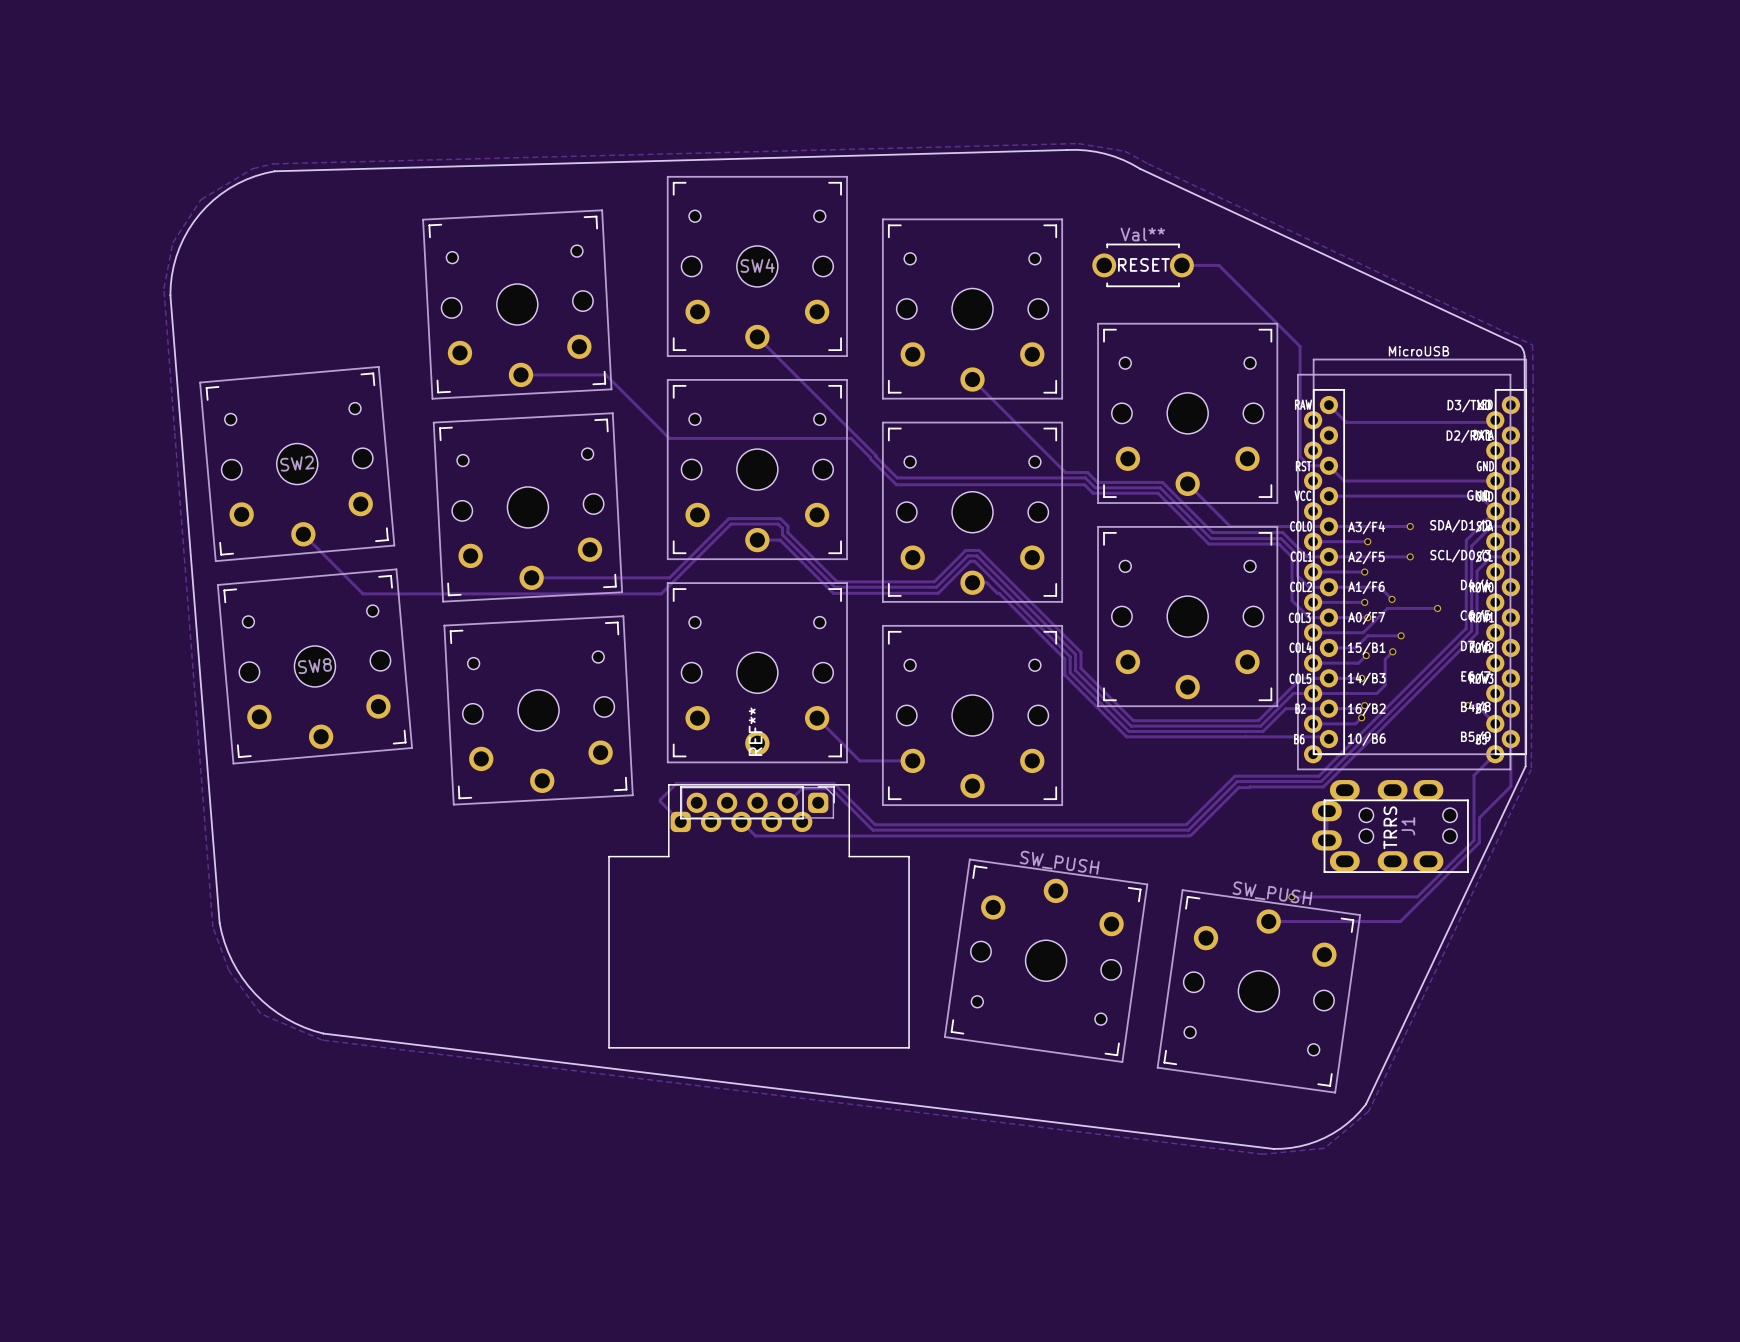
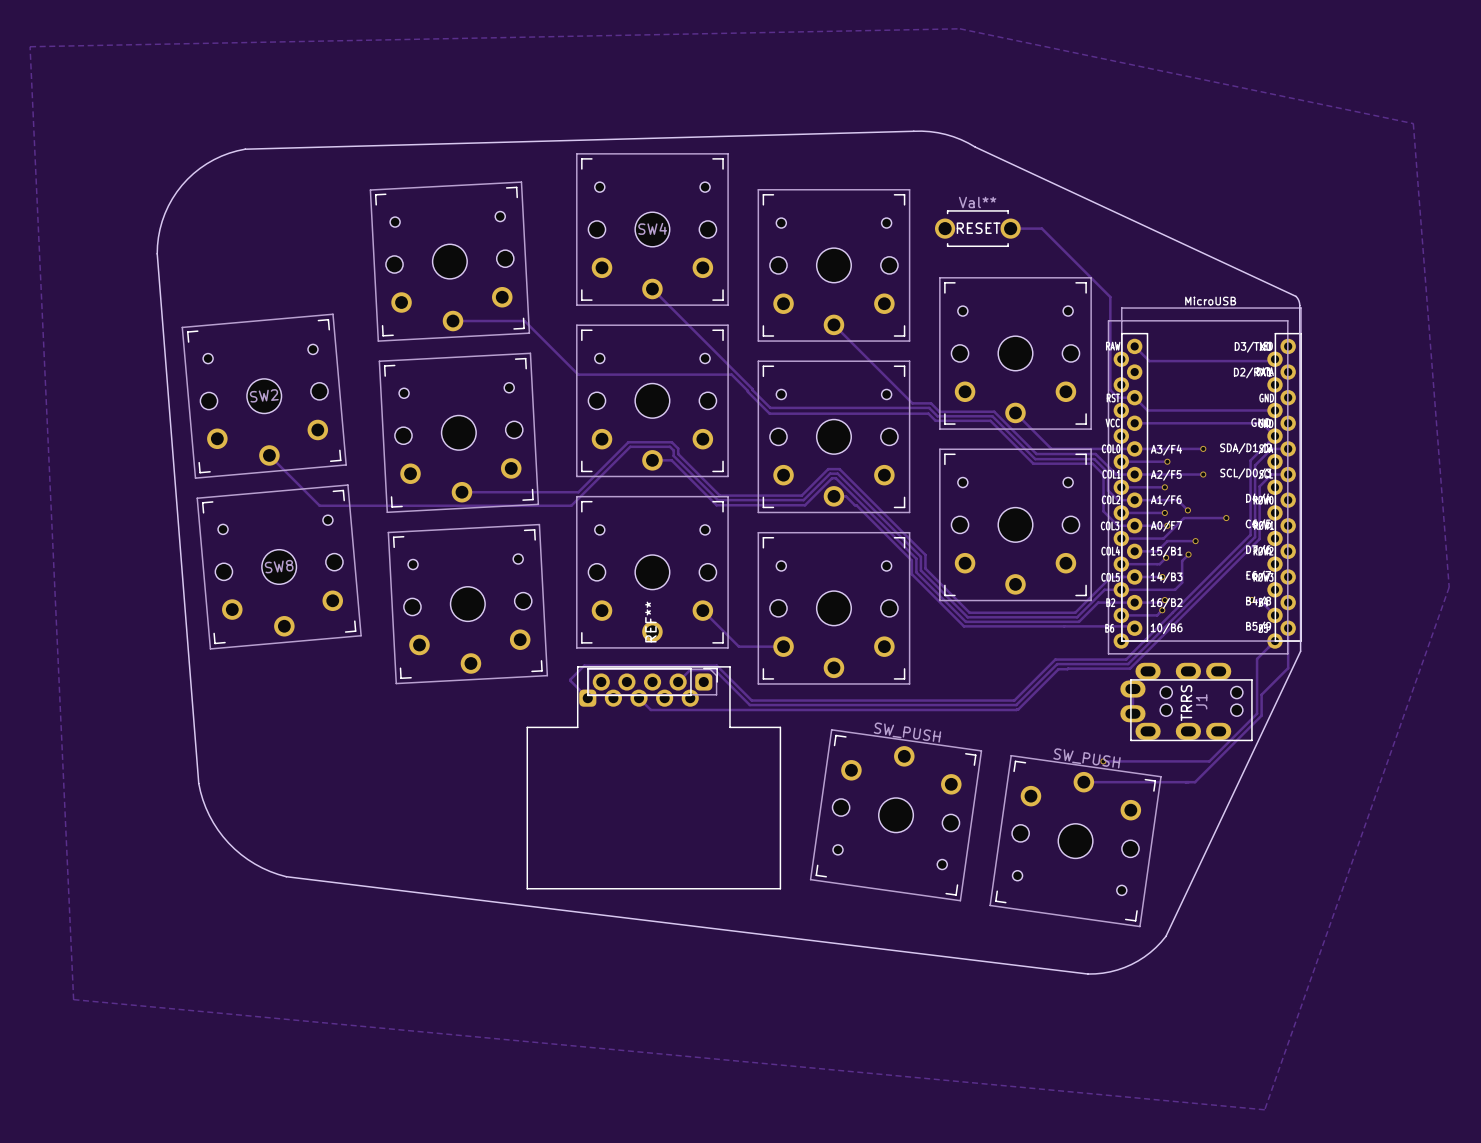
zone outline: (1078, 143) (273, 163) (252, 168) (200, 199) (172, 242) (163, 288) (212, 927) (229, 970) (260, 1013) (322, 1040) (1262, 1154) (1324, 1148) (1368, 1111) (1531, 769) (1532, 344) (1124, 151) (1078, 143) -> (959, 28) (30, 46) (73, 999) (1264, 1109) (1449, 587) (1413, 123) (959, 28)

